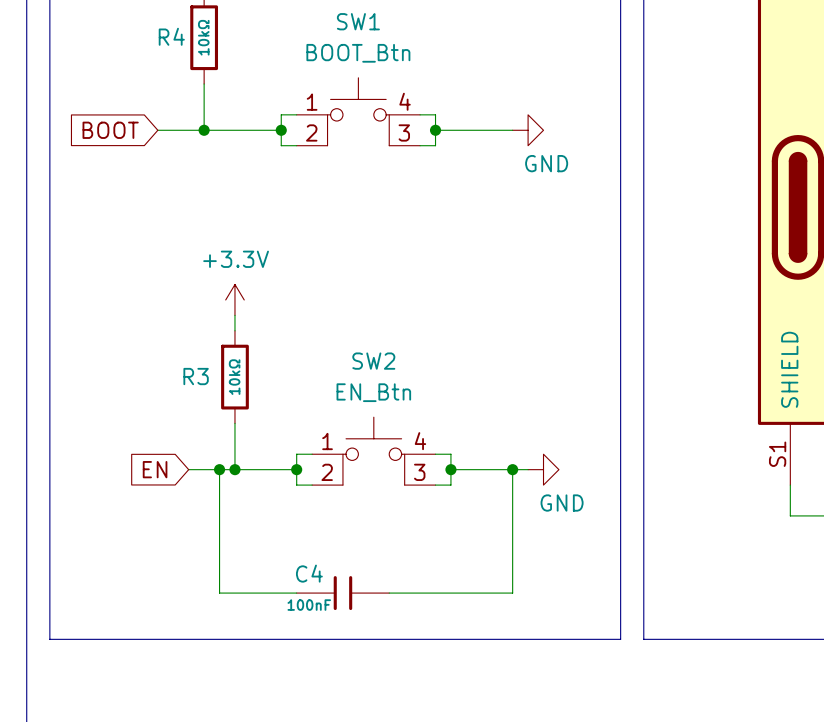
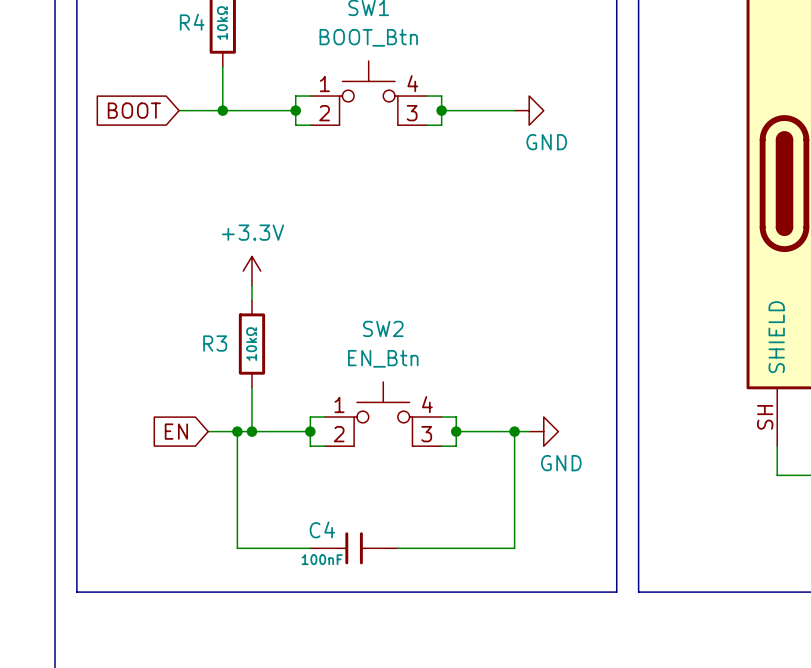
part pin number: S1 (777, 454) -> SH (765, 417)

